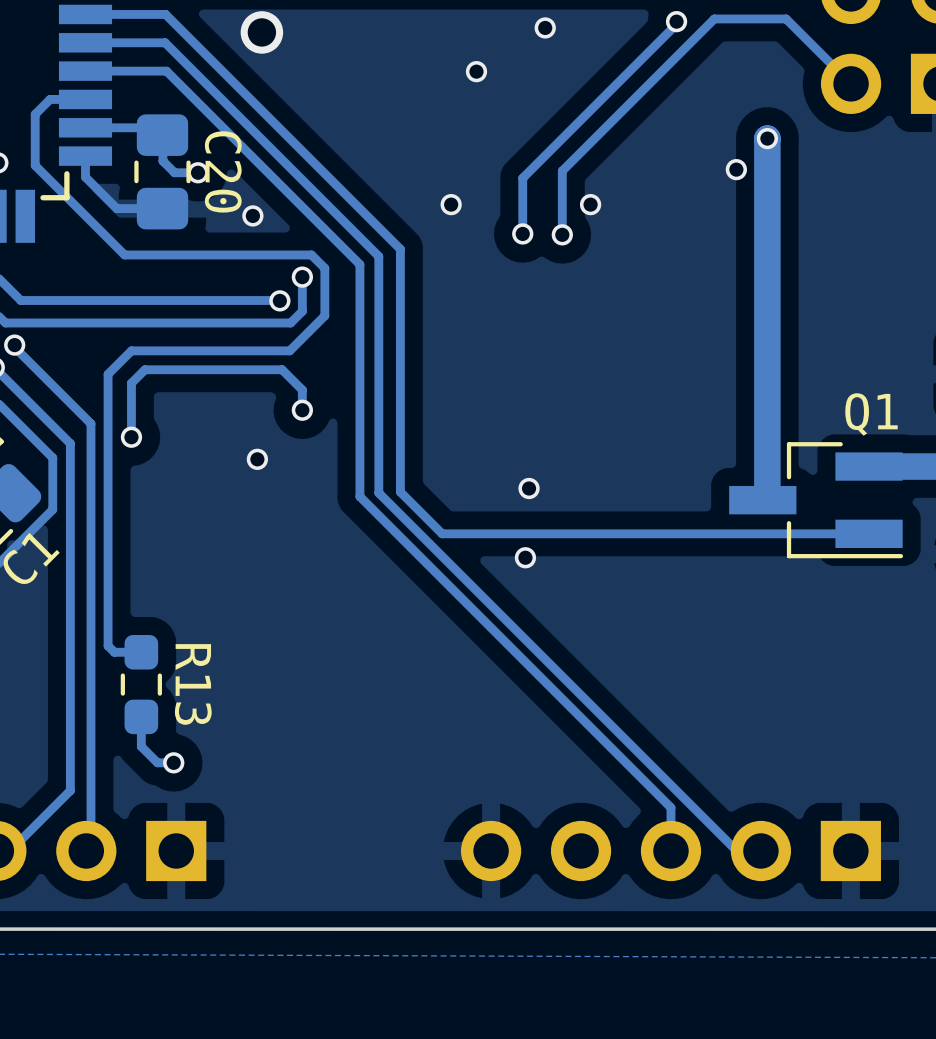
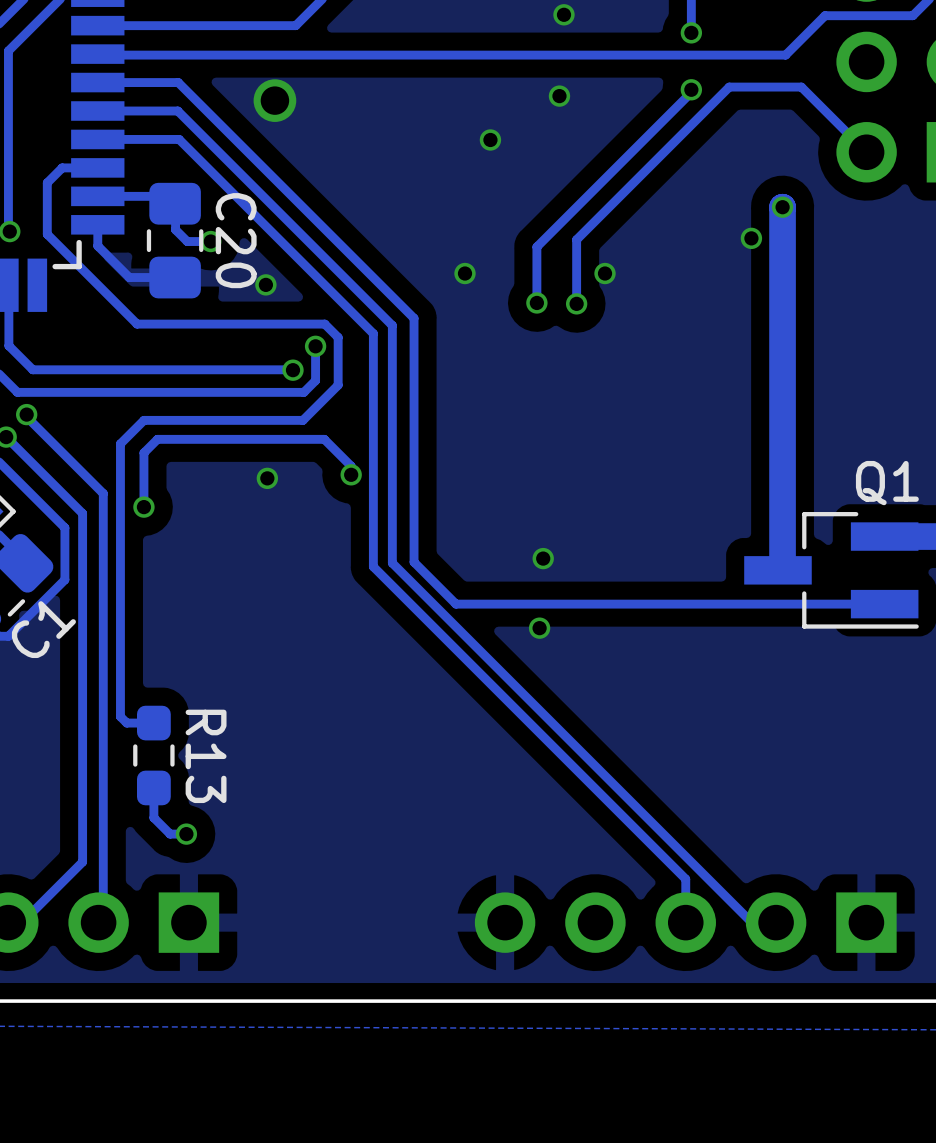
track: (282, 369) (302, 390) (302, 410) -> (295, 439) (324, 439) (351, 466) (351, 474)
via: none -> (351, 474)
via: none -> (267, 478)
via: (302, 410) -> none
via: (257, 459) -> none

